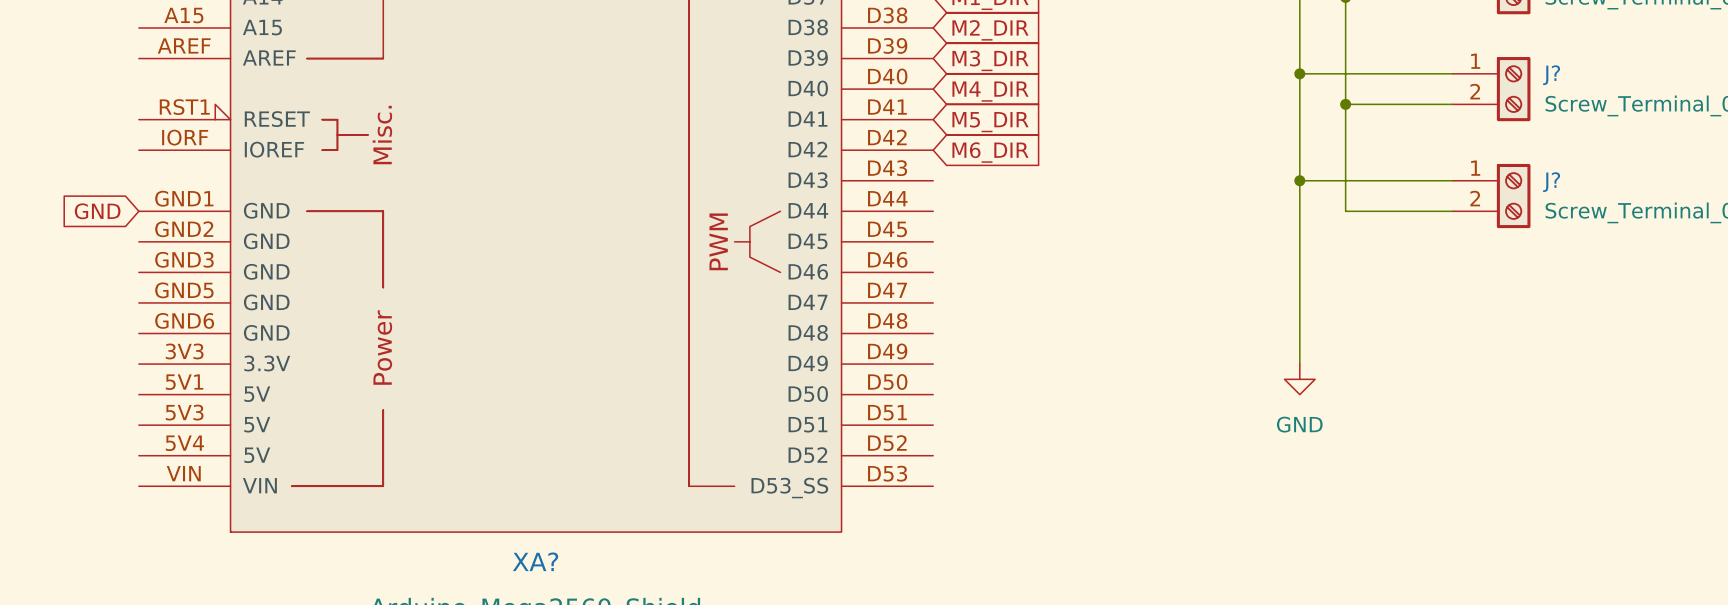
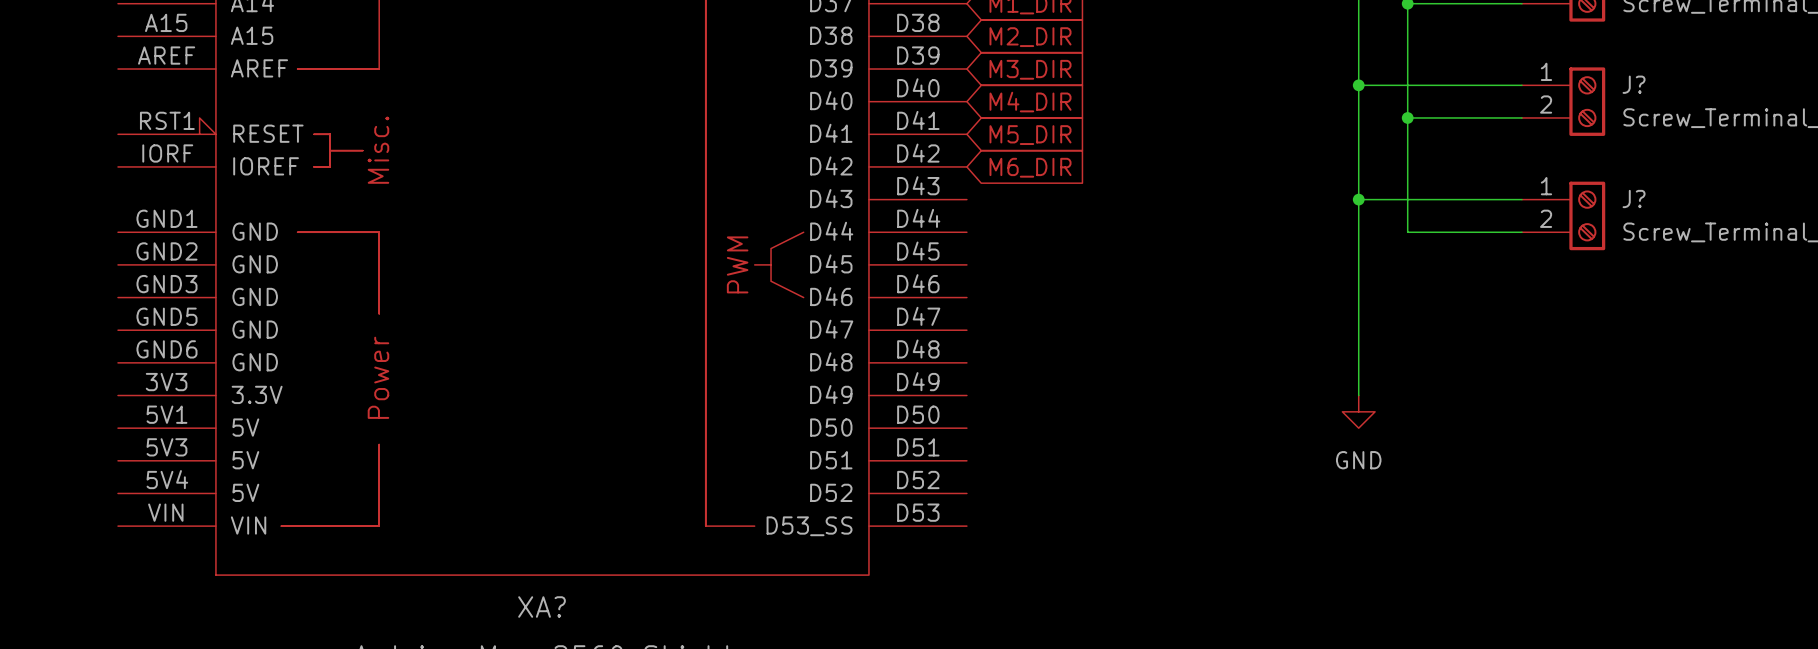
global label: GND (97, 211) -> none

